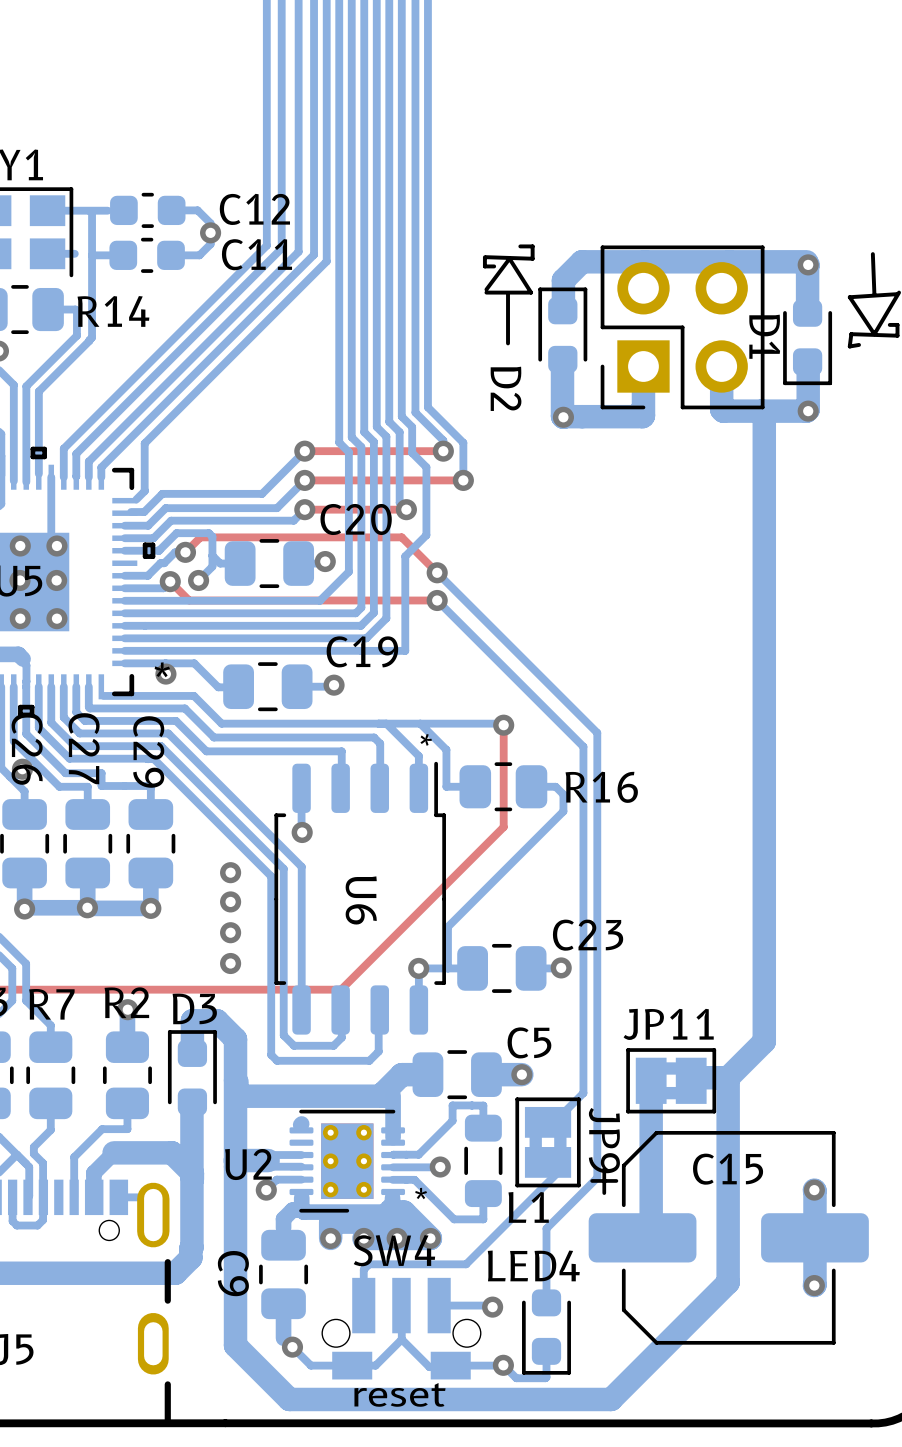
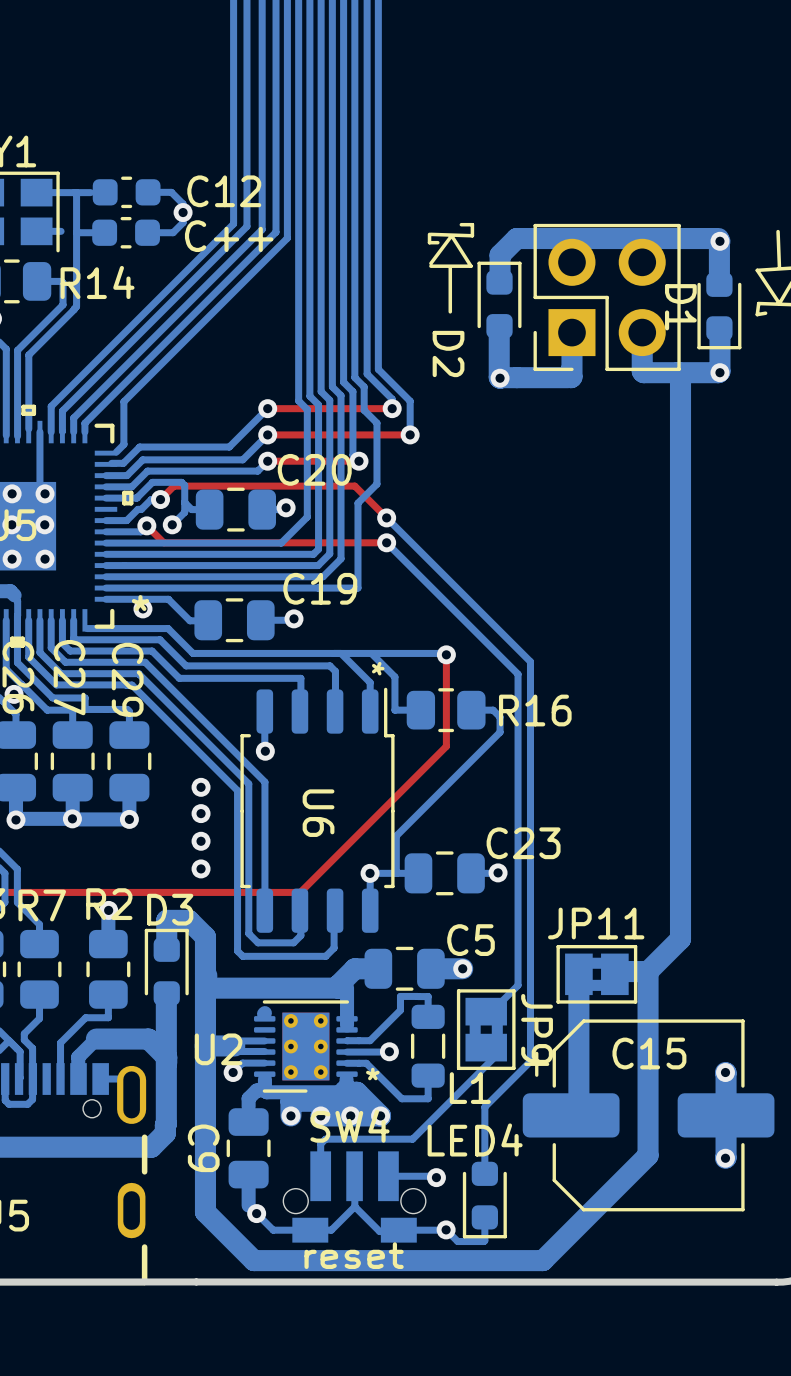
C11 name: C11 (256, 254) -> C++ (229, 236)

